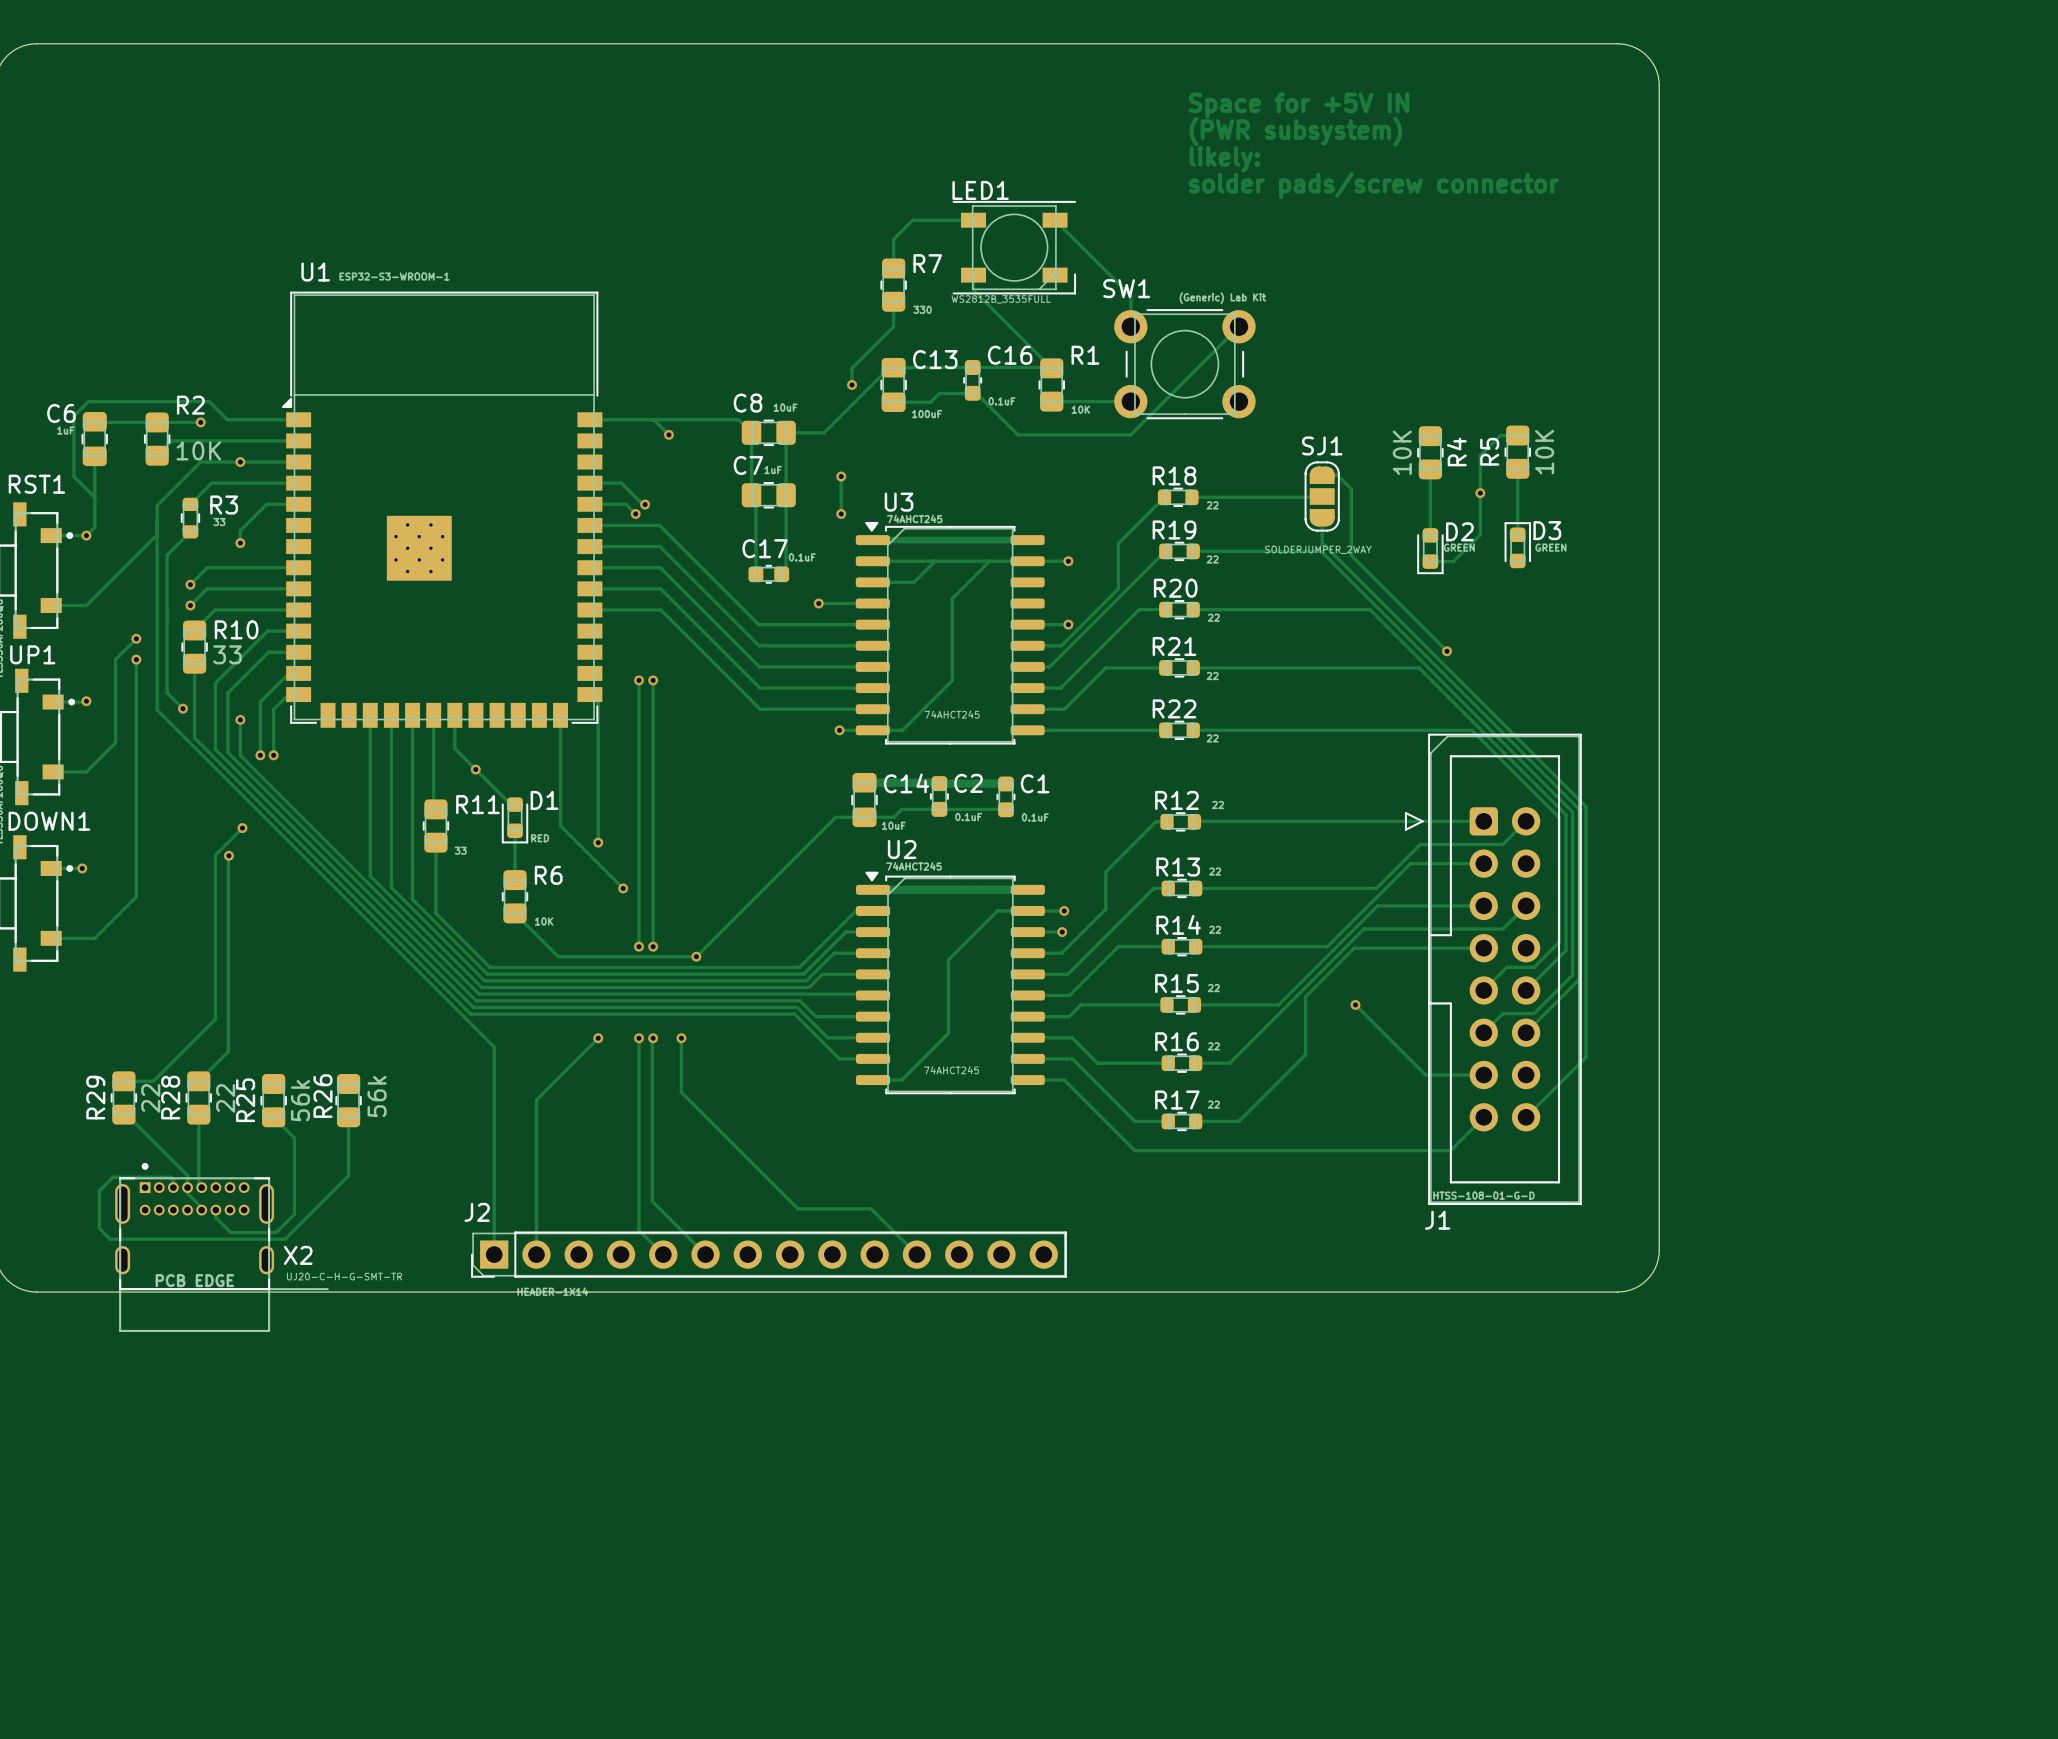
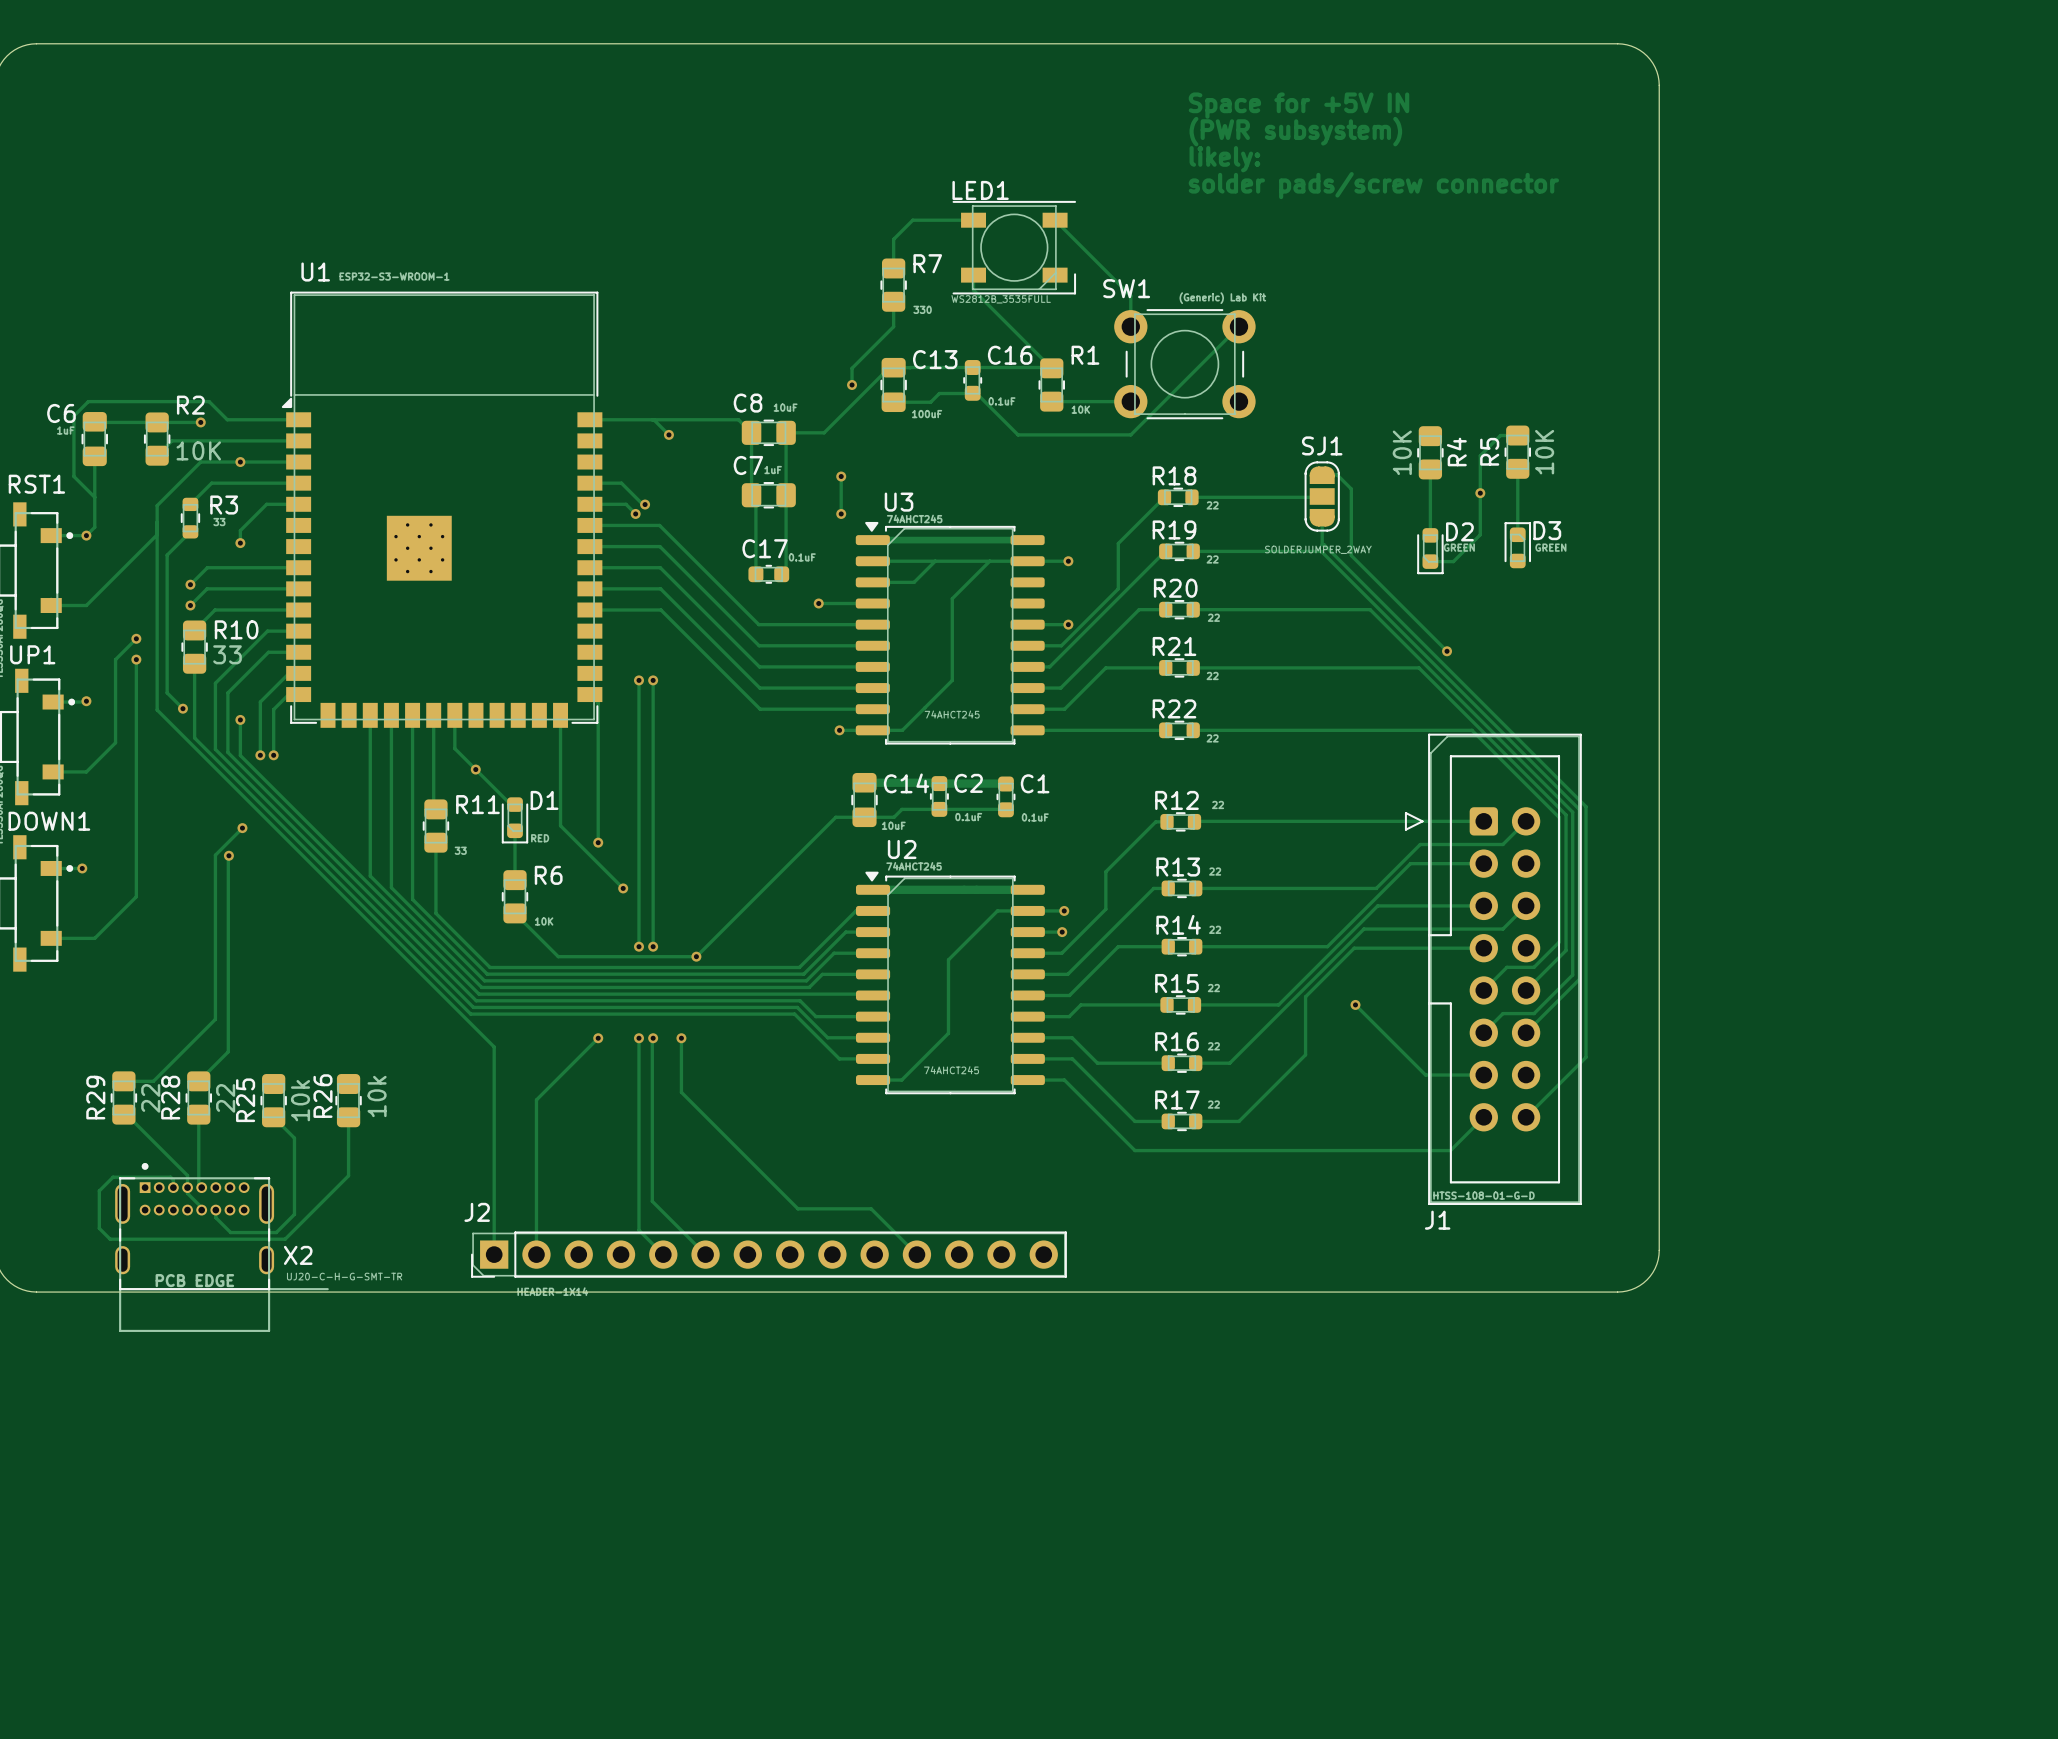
R26 value: 56k (377, 1096) -> 10k (377, 1096)
R25 value: 56k (300, 1100) -> 10k (300, 1100)

